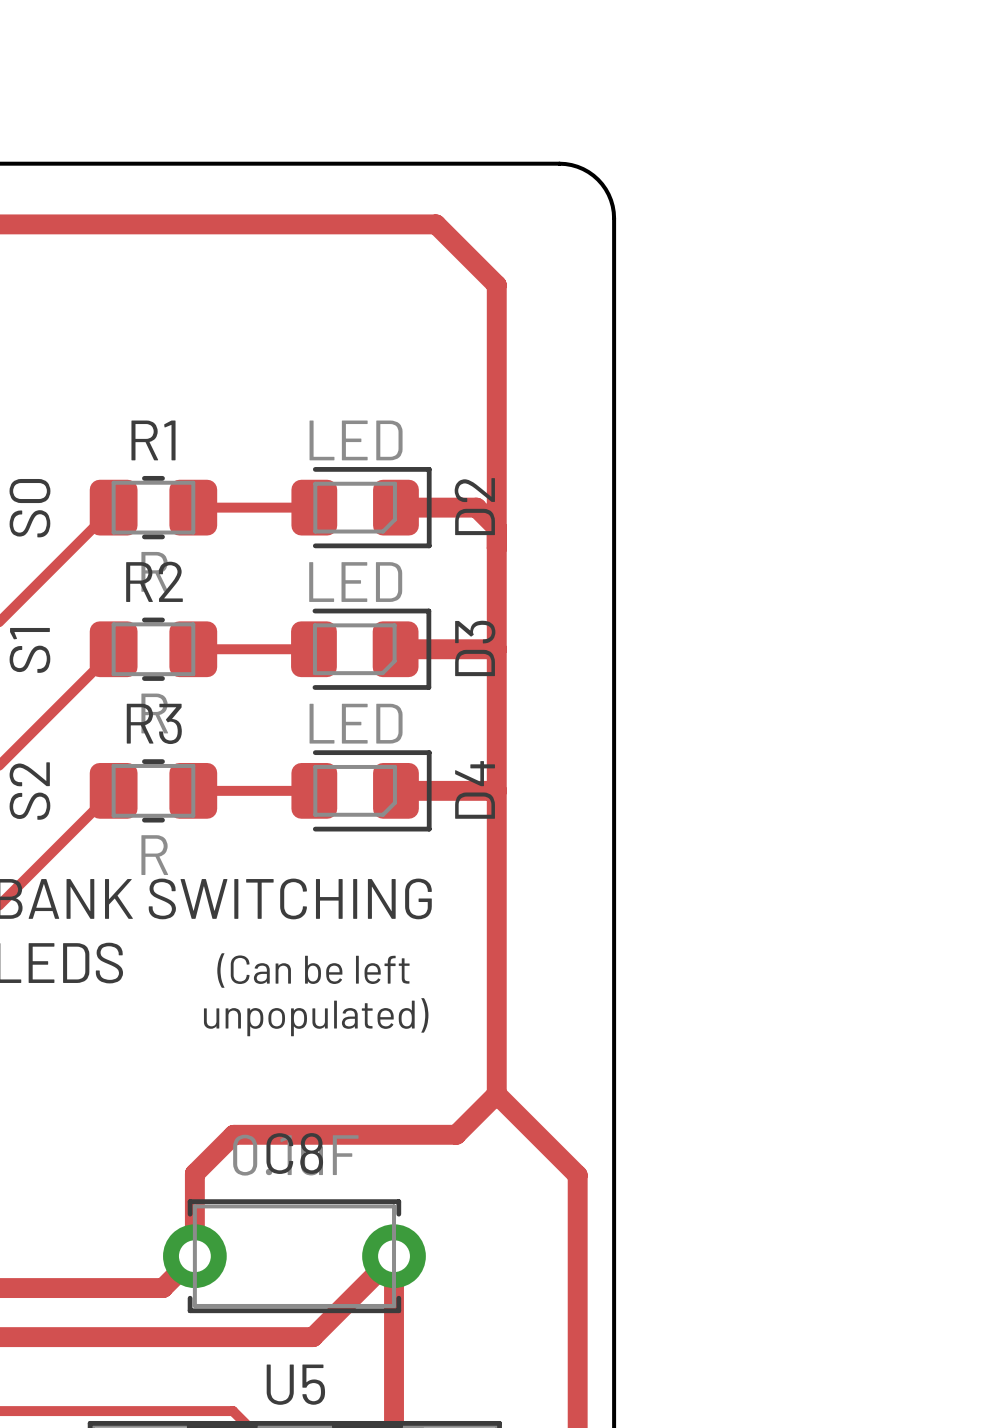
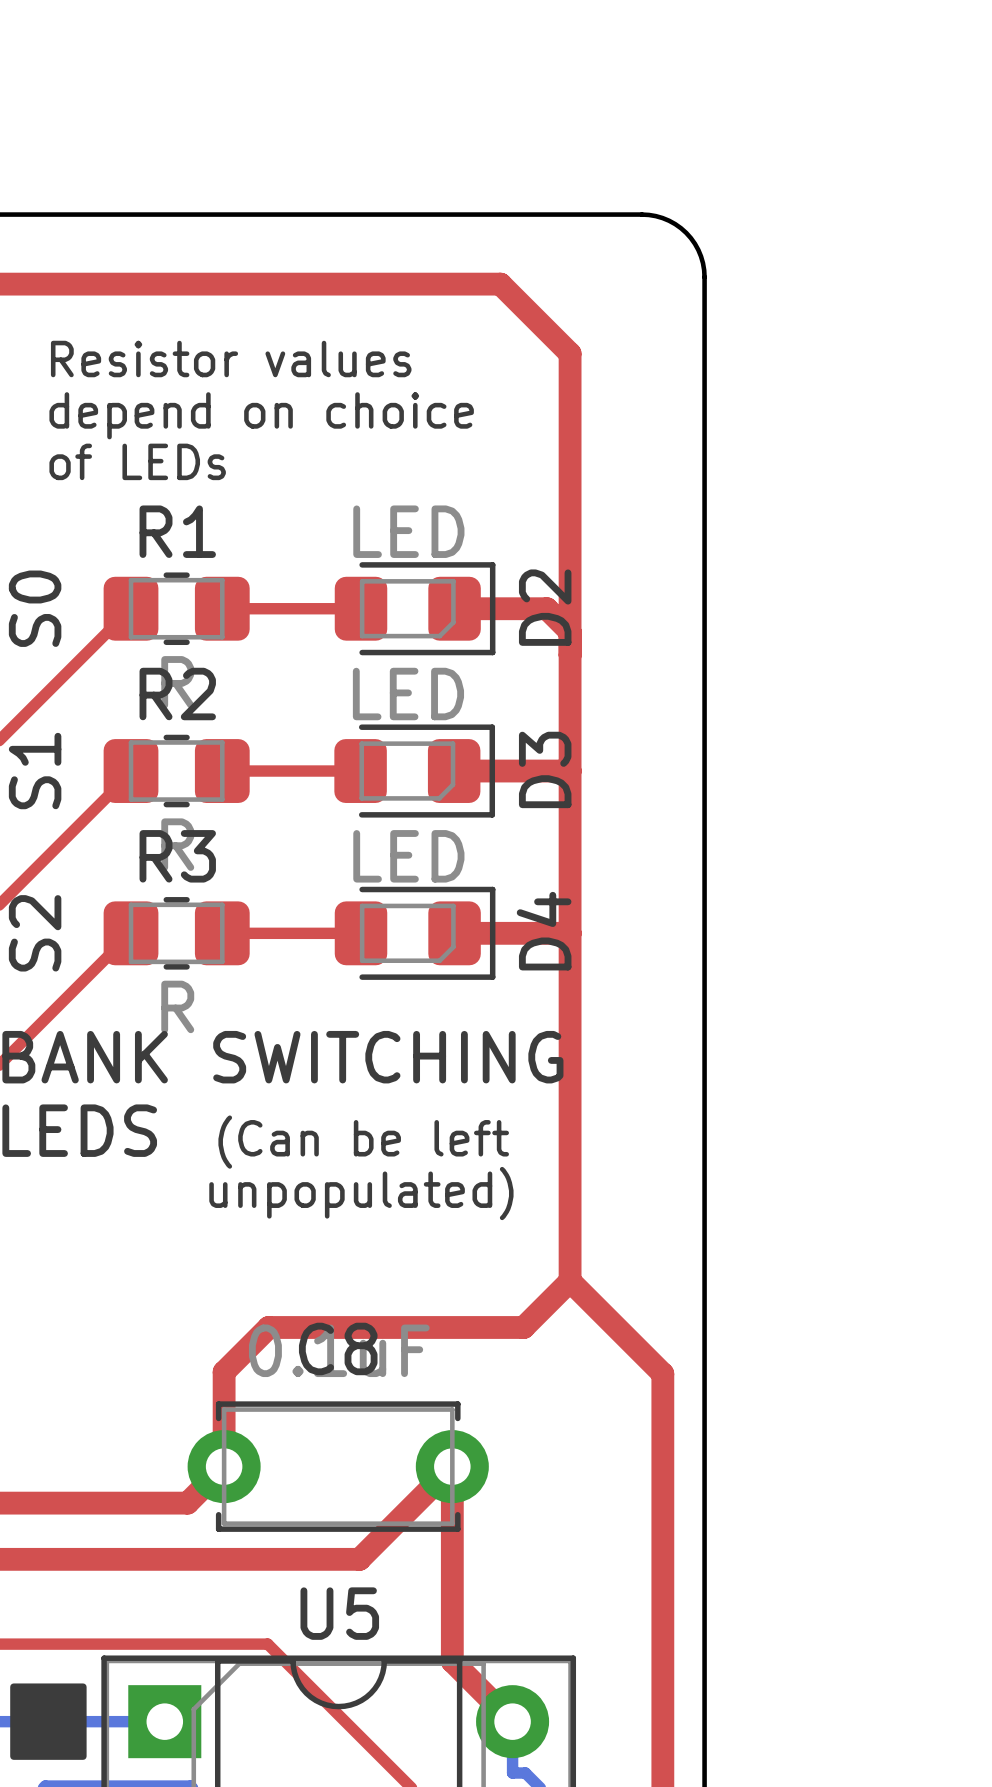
text: none -> Resistor values (231, 359)
text: none -> depend on choice (261, 415)
text: none -> of LEDs (137, 461)

